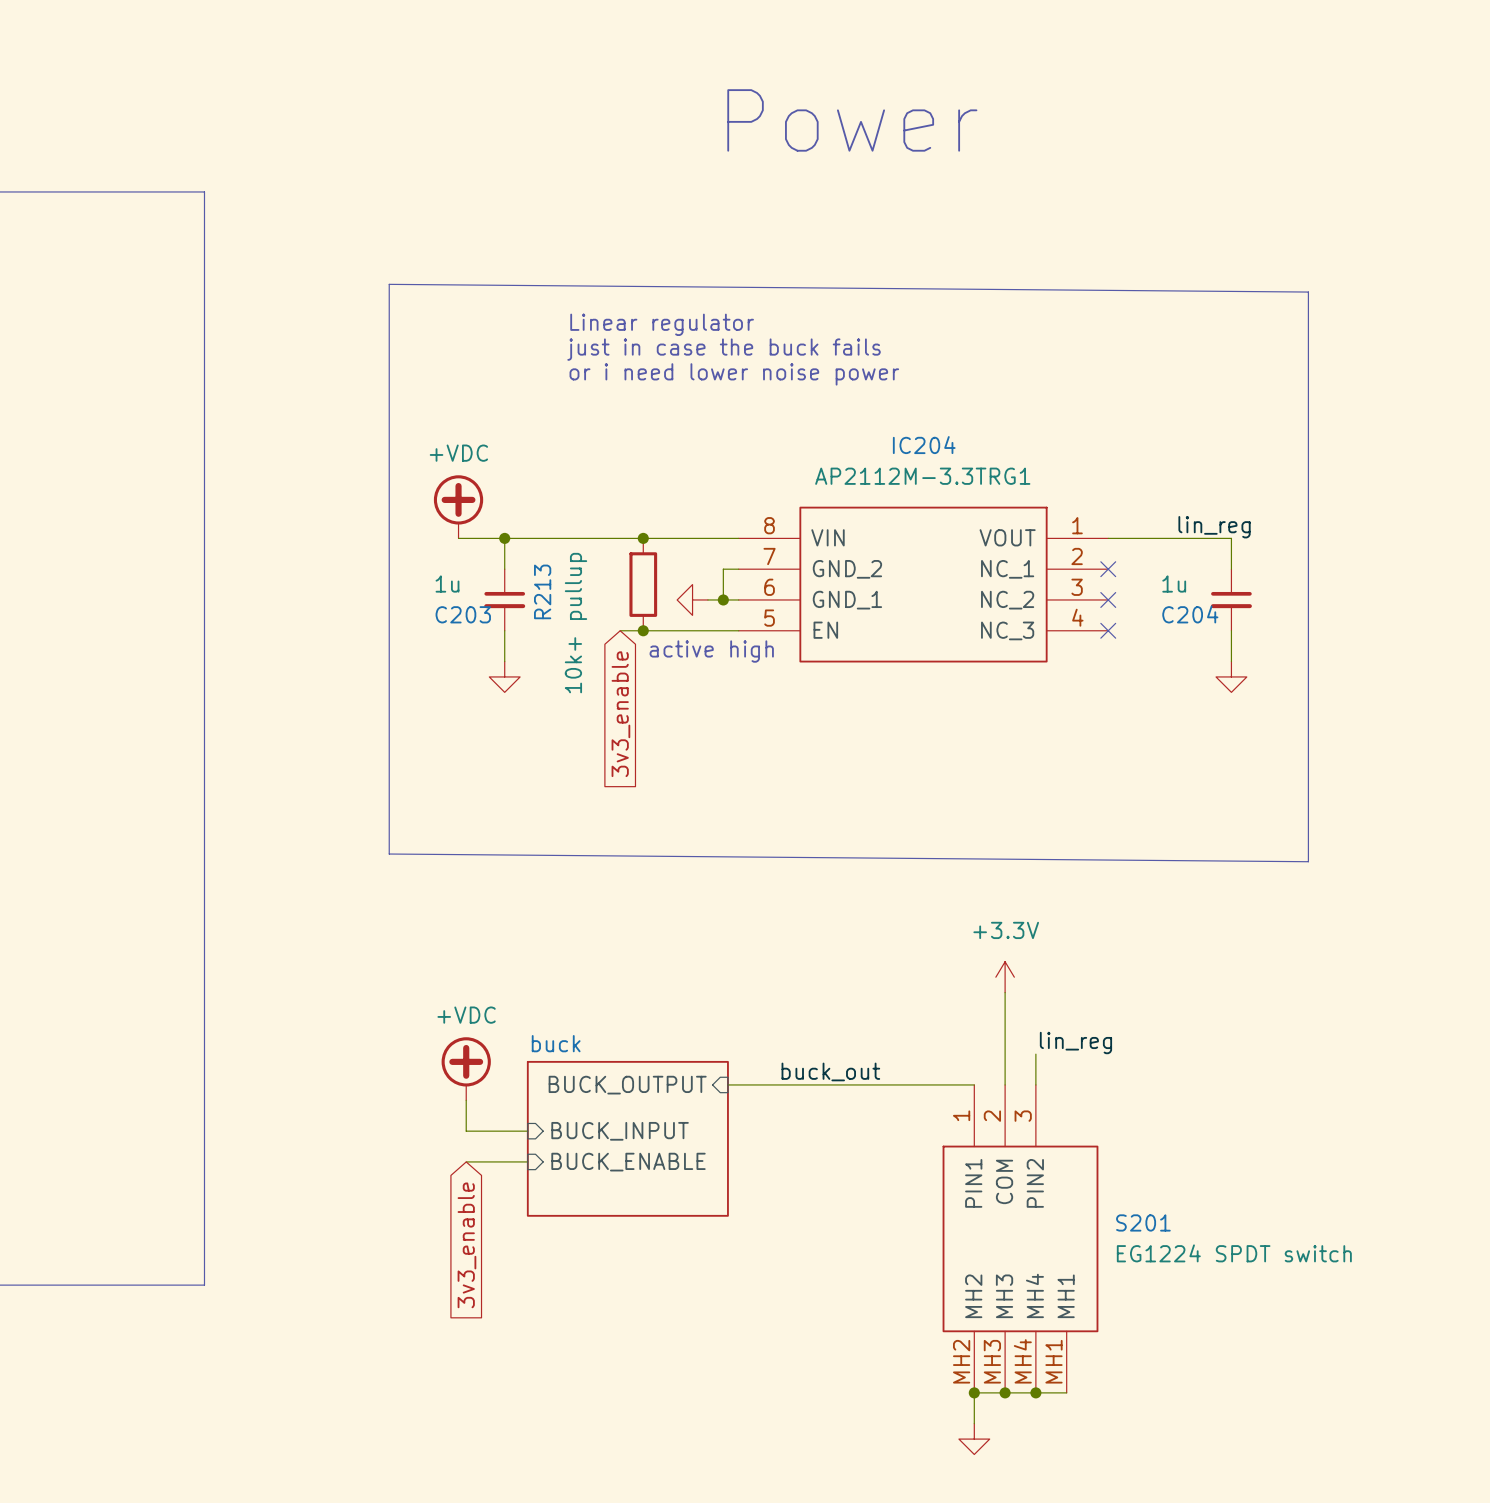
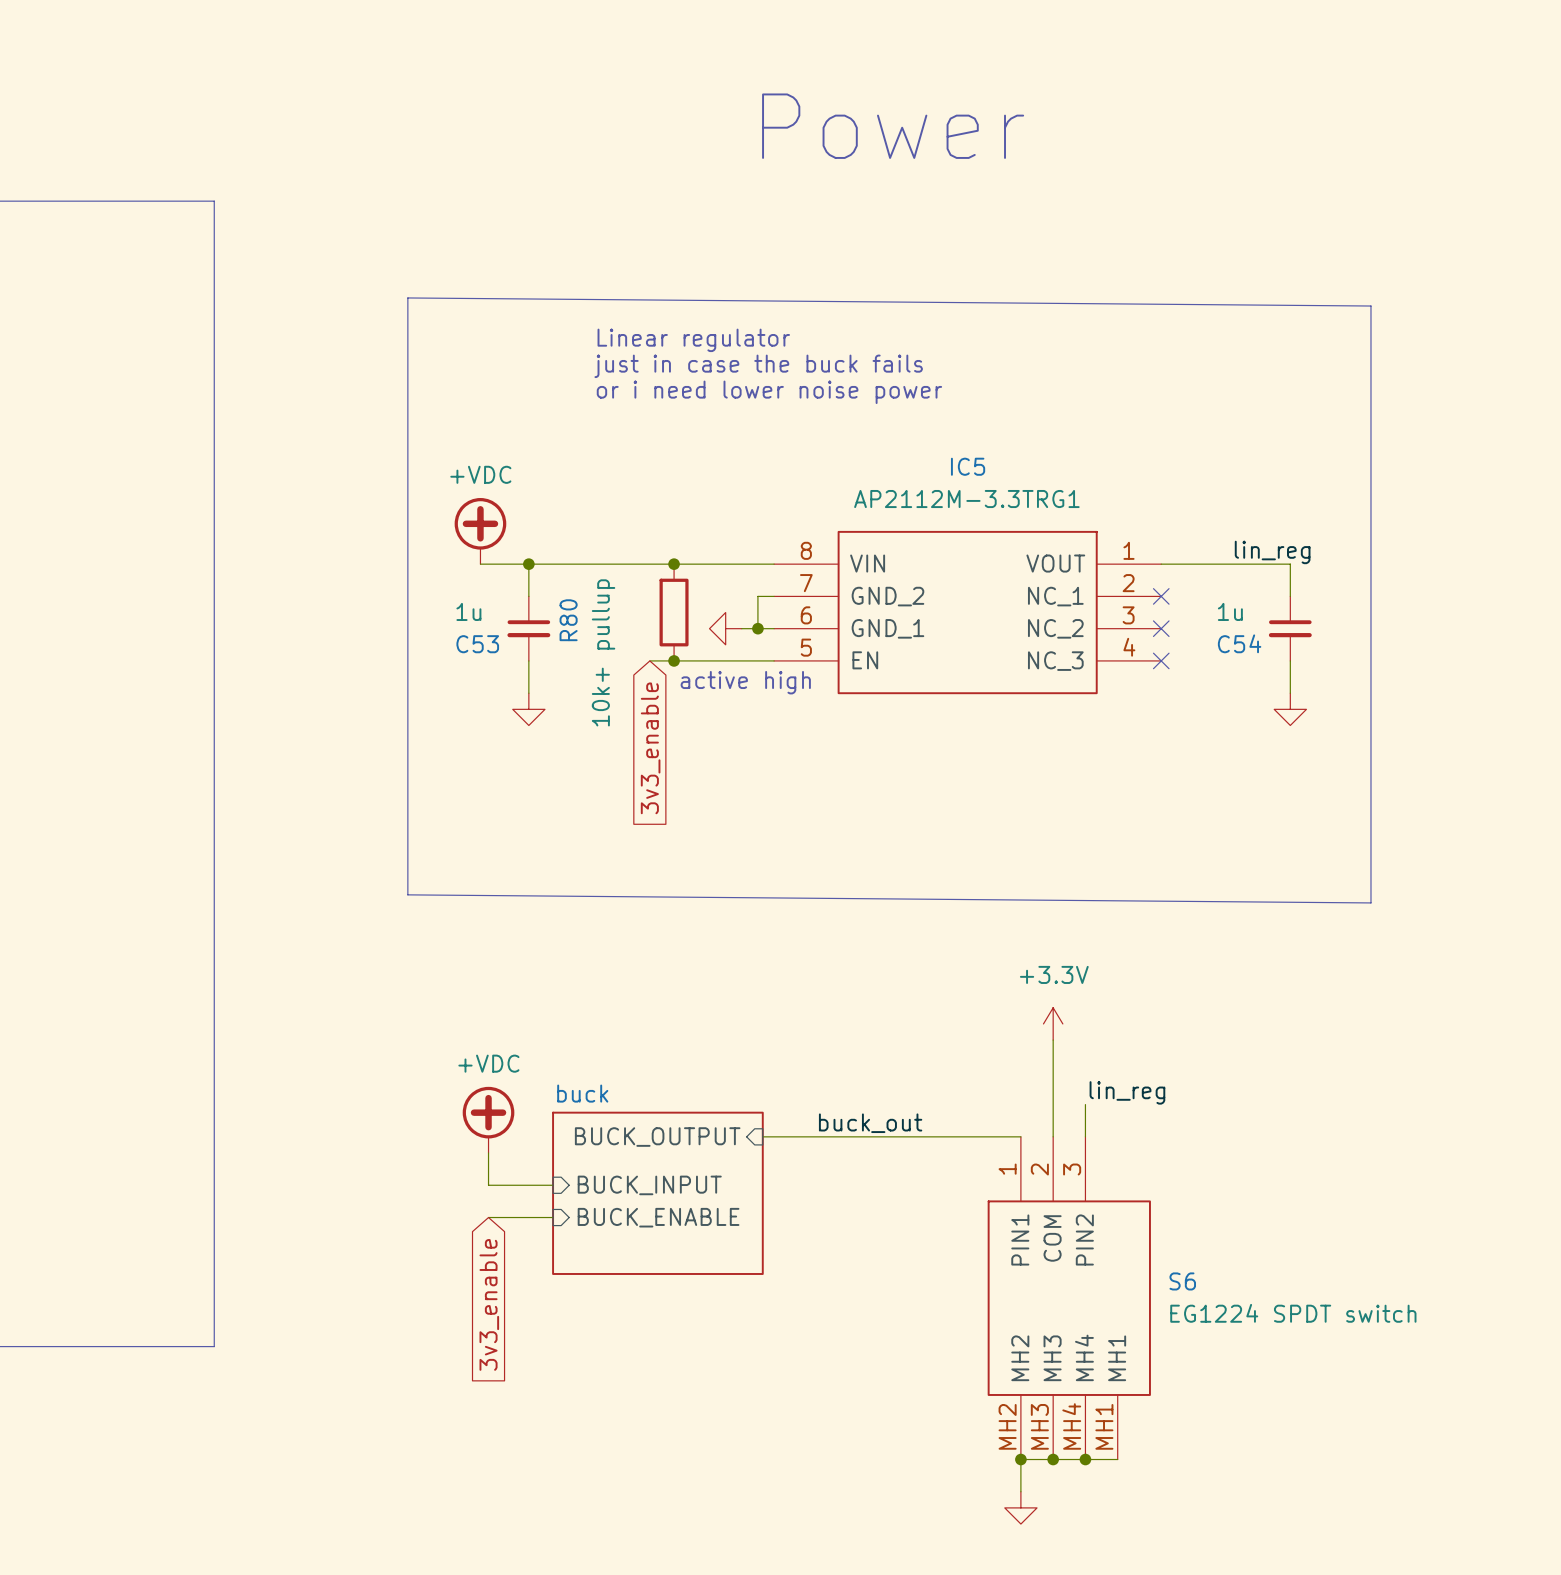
IC204 name: IC204 (924, 445) -> IC5 (968, 466)
R213 name: R213 (542, 591) -> R80 (568, 620)
C203 name: C203 (463, 614) -> C53 (477, 644)
C204 name: C204 (1190, 614) -> C54 (1239, 643)
S201 name: S201 (1143, 1222) -> S6 (1182, 1281)

